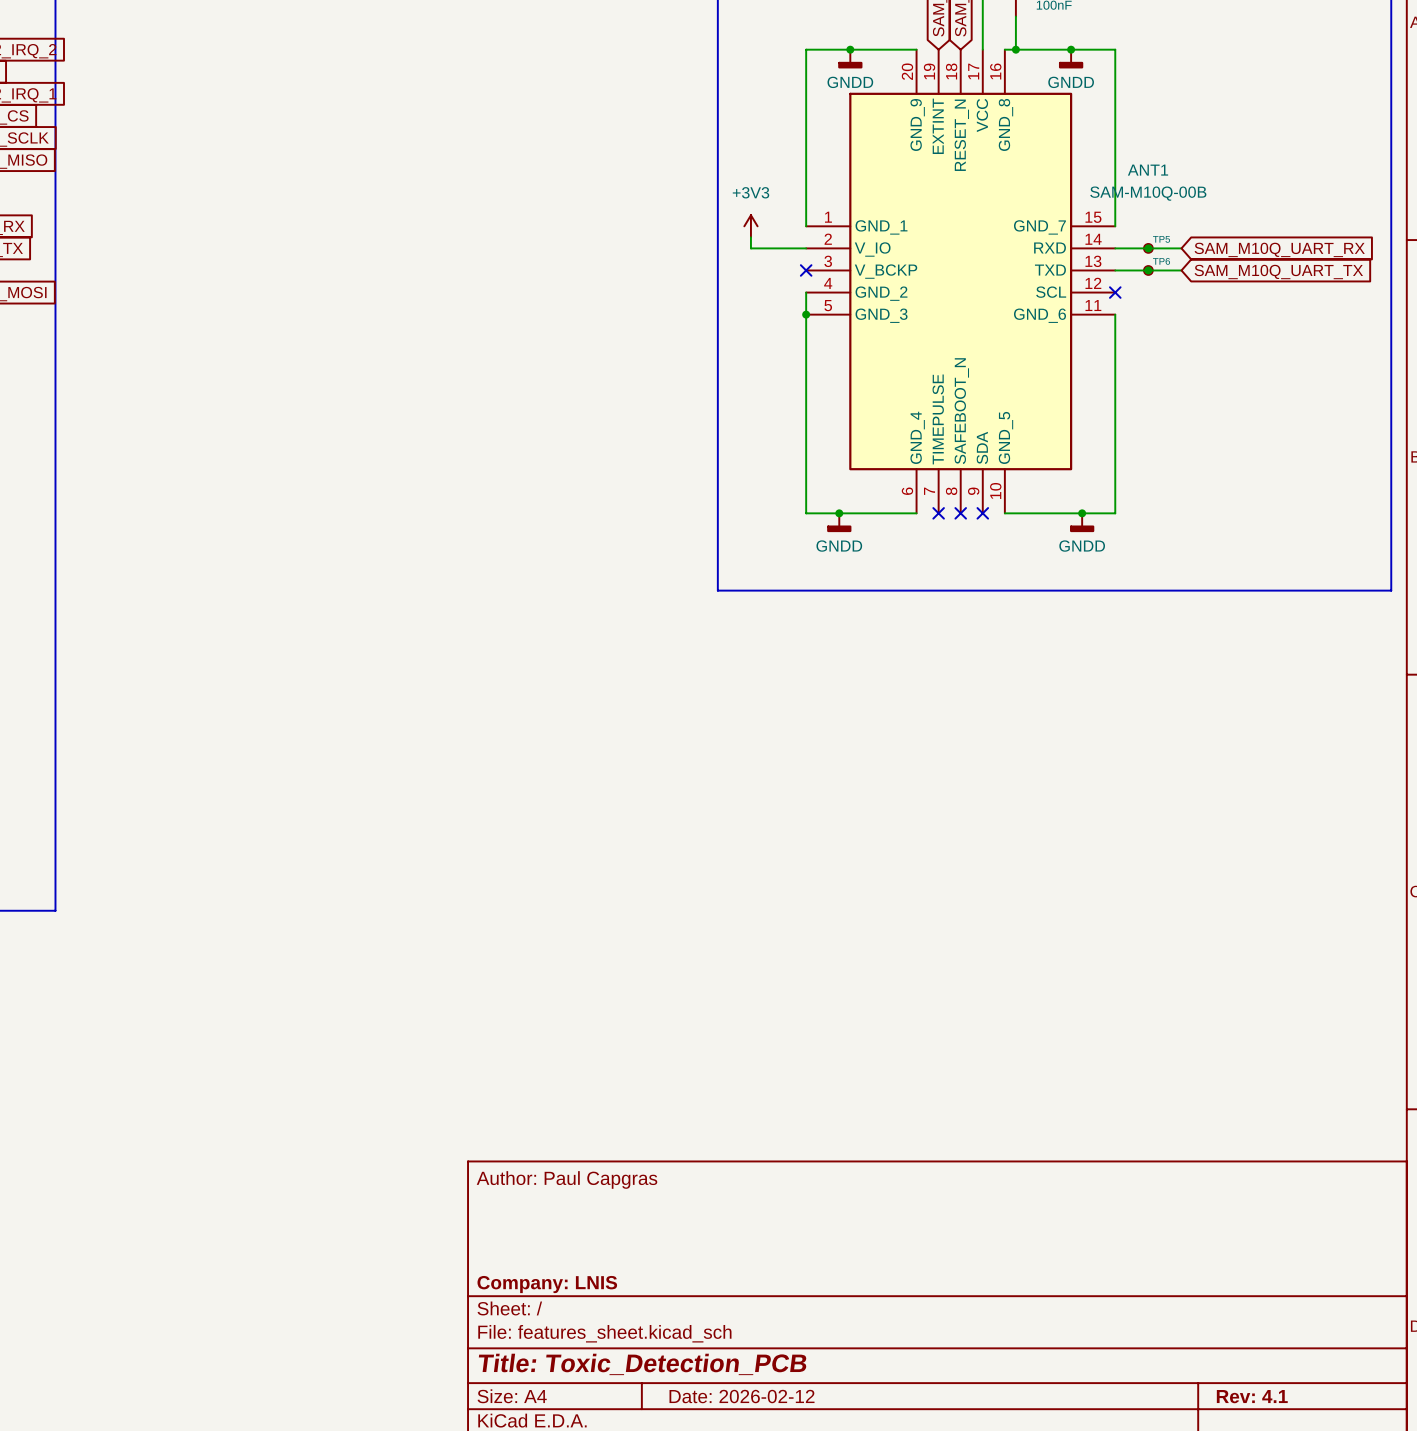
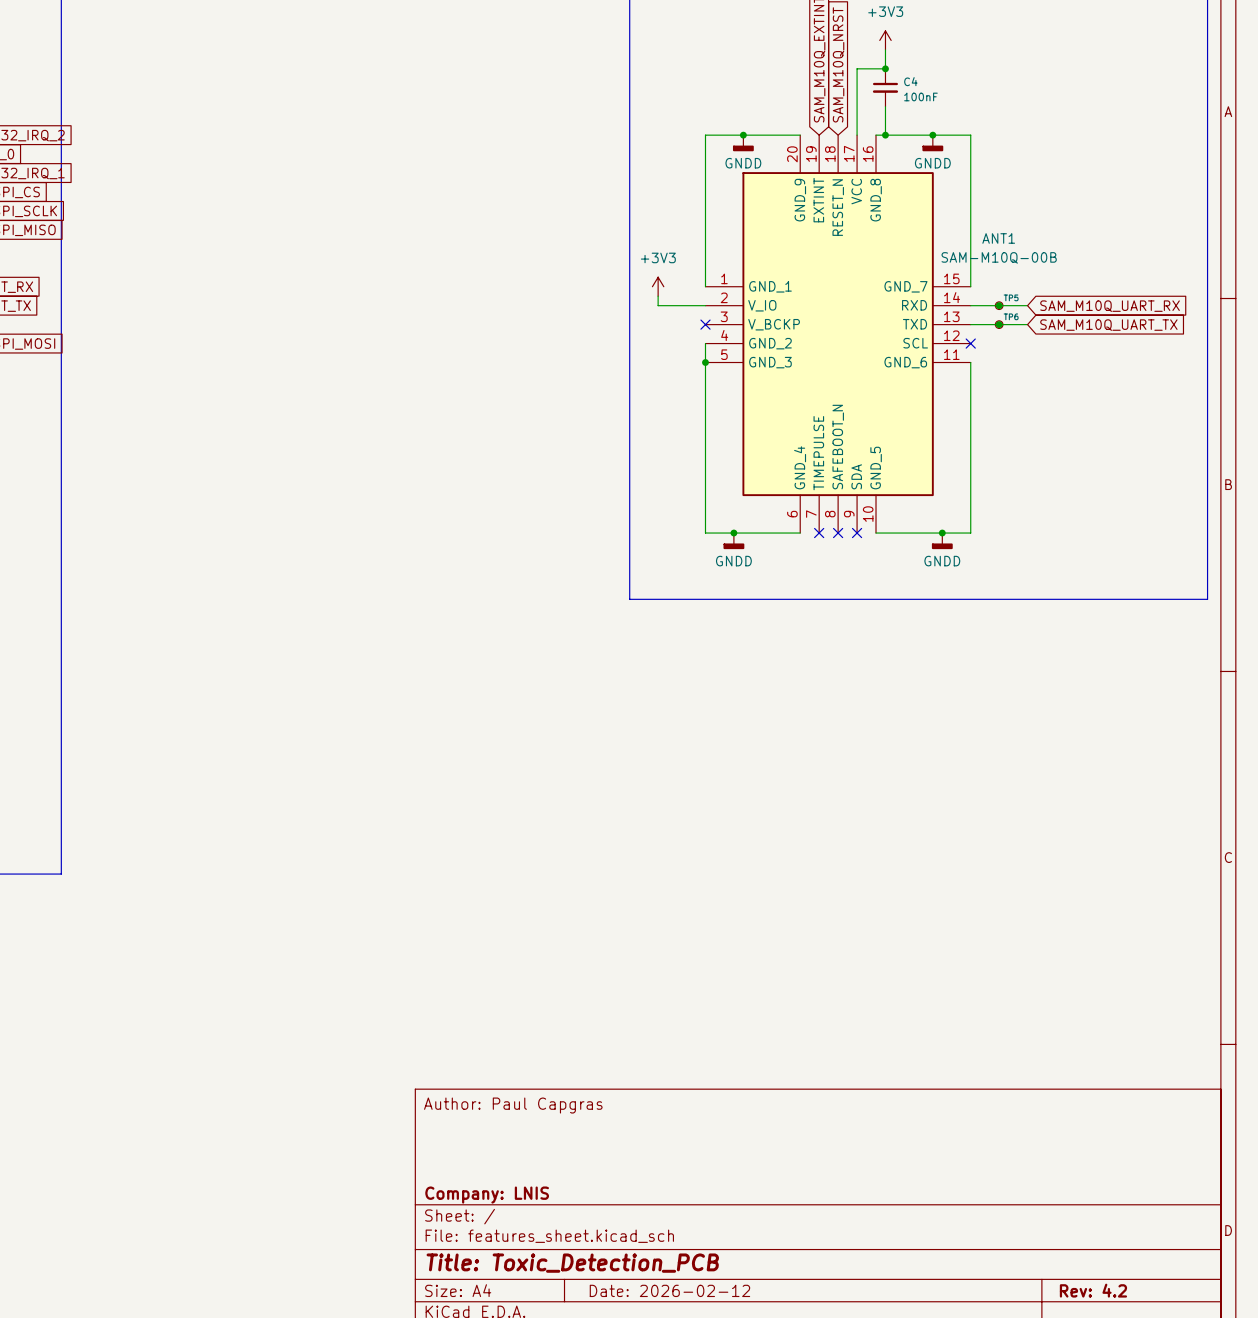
title block: Rev: 4.1 (1252, 1396) -> Rev: 4.2 (1093, 1290)

